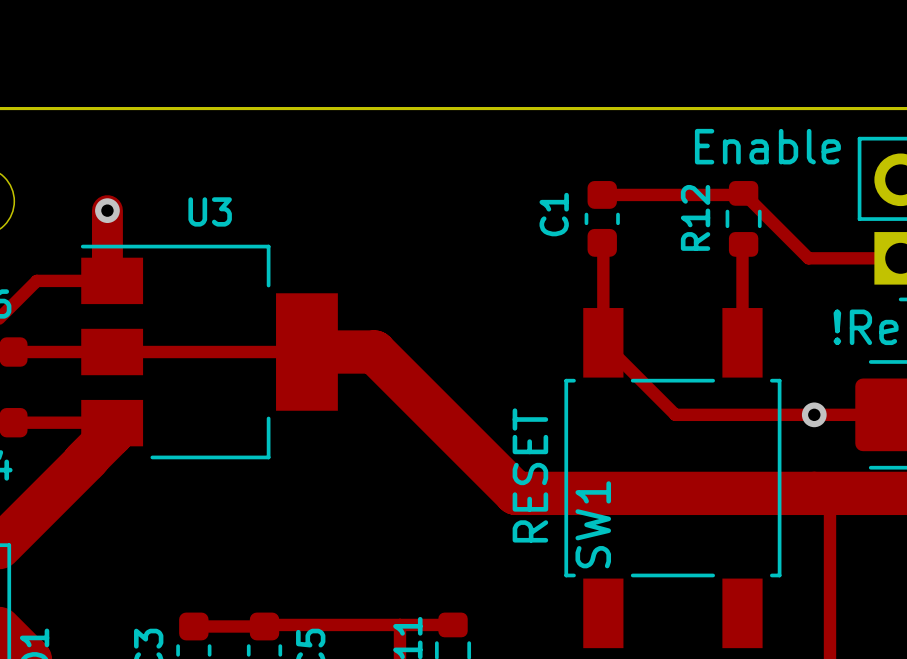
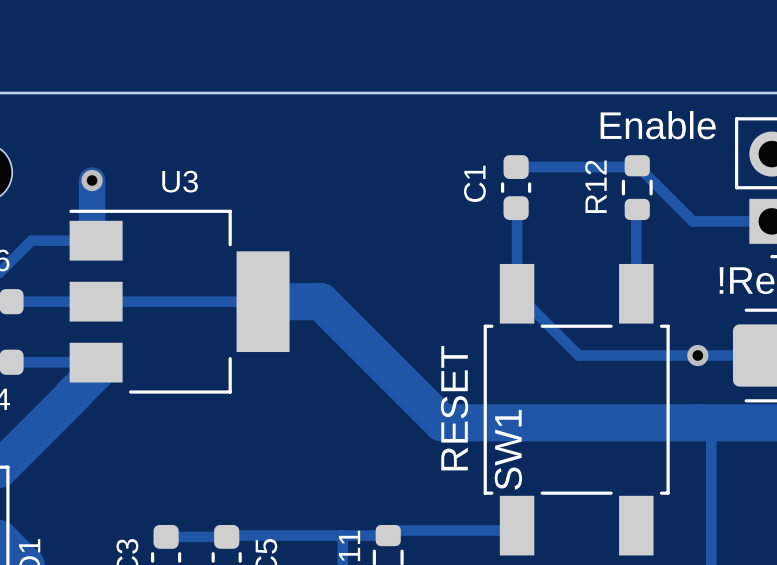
track: none -> (517, 525) (512, 530) (393, 530) (388, 535)

